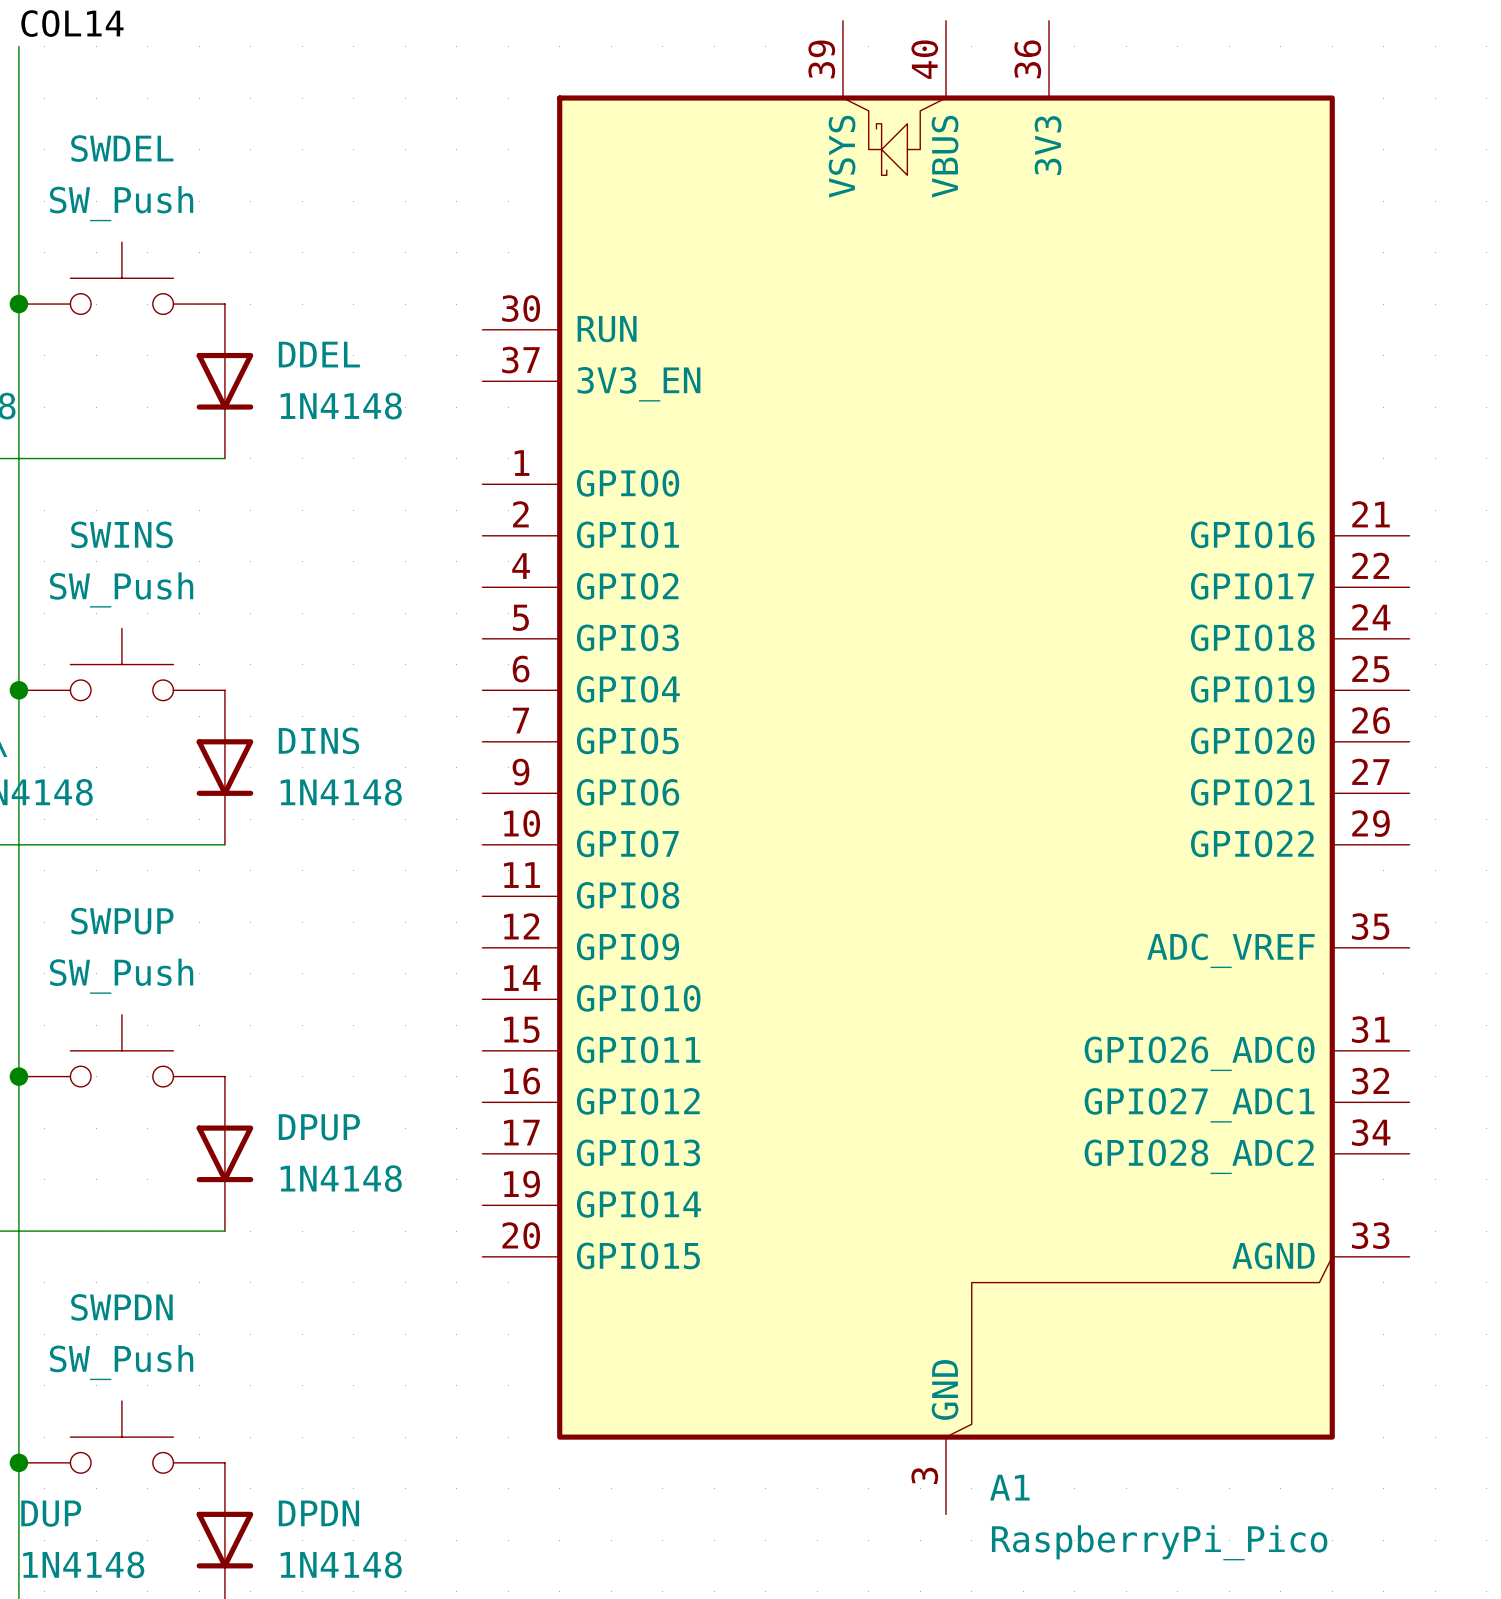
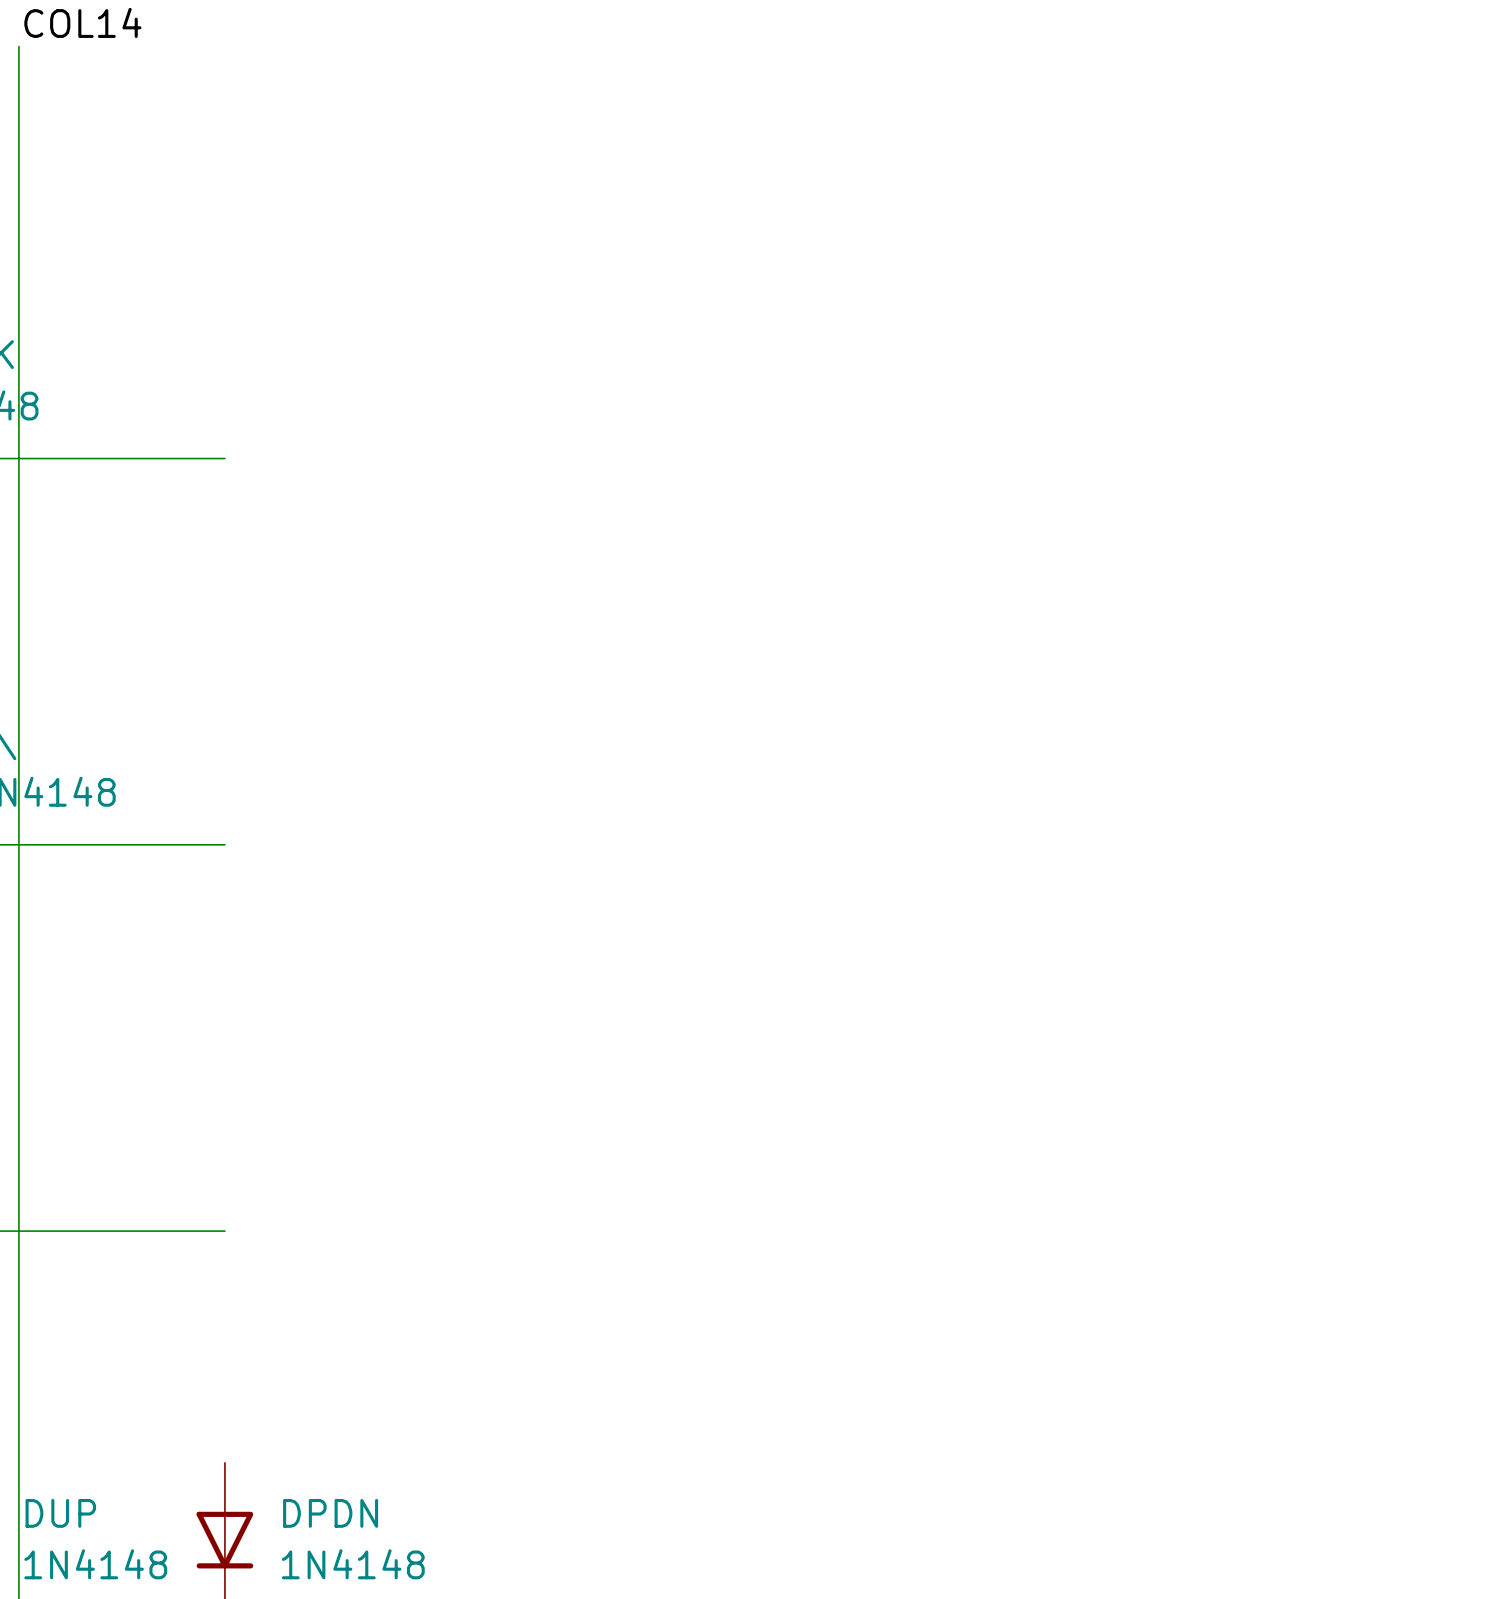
SWDEL: SW_Push (121, 278) -> none
junction: (18, 304) -> none
DDEL: 1N4148 (224, 381) -> none
SWINS: SW_Push (121, 664) -> none
junction: (18, 690) -> none
DINS: 1N4148 (224, 767) -> none
A1: RaspberryPi_Pico (945, 767) -> none
SWPUP: SW_Push (121, 1050) -> none
junction: (18, 1076) -> none
DPUP: 1N4148 (224, 1153) -> none
SWPDN: SW_Push (121, 1437) -> none
junction: (18, 1462) -> none

